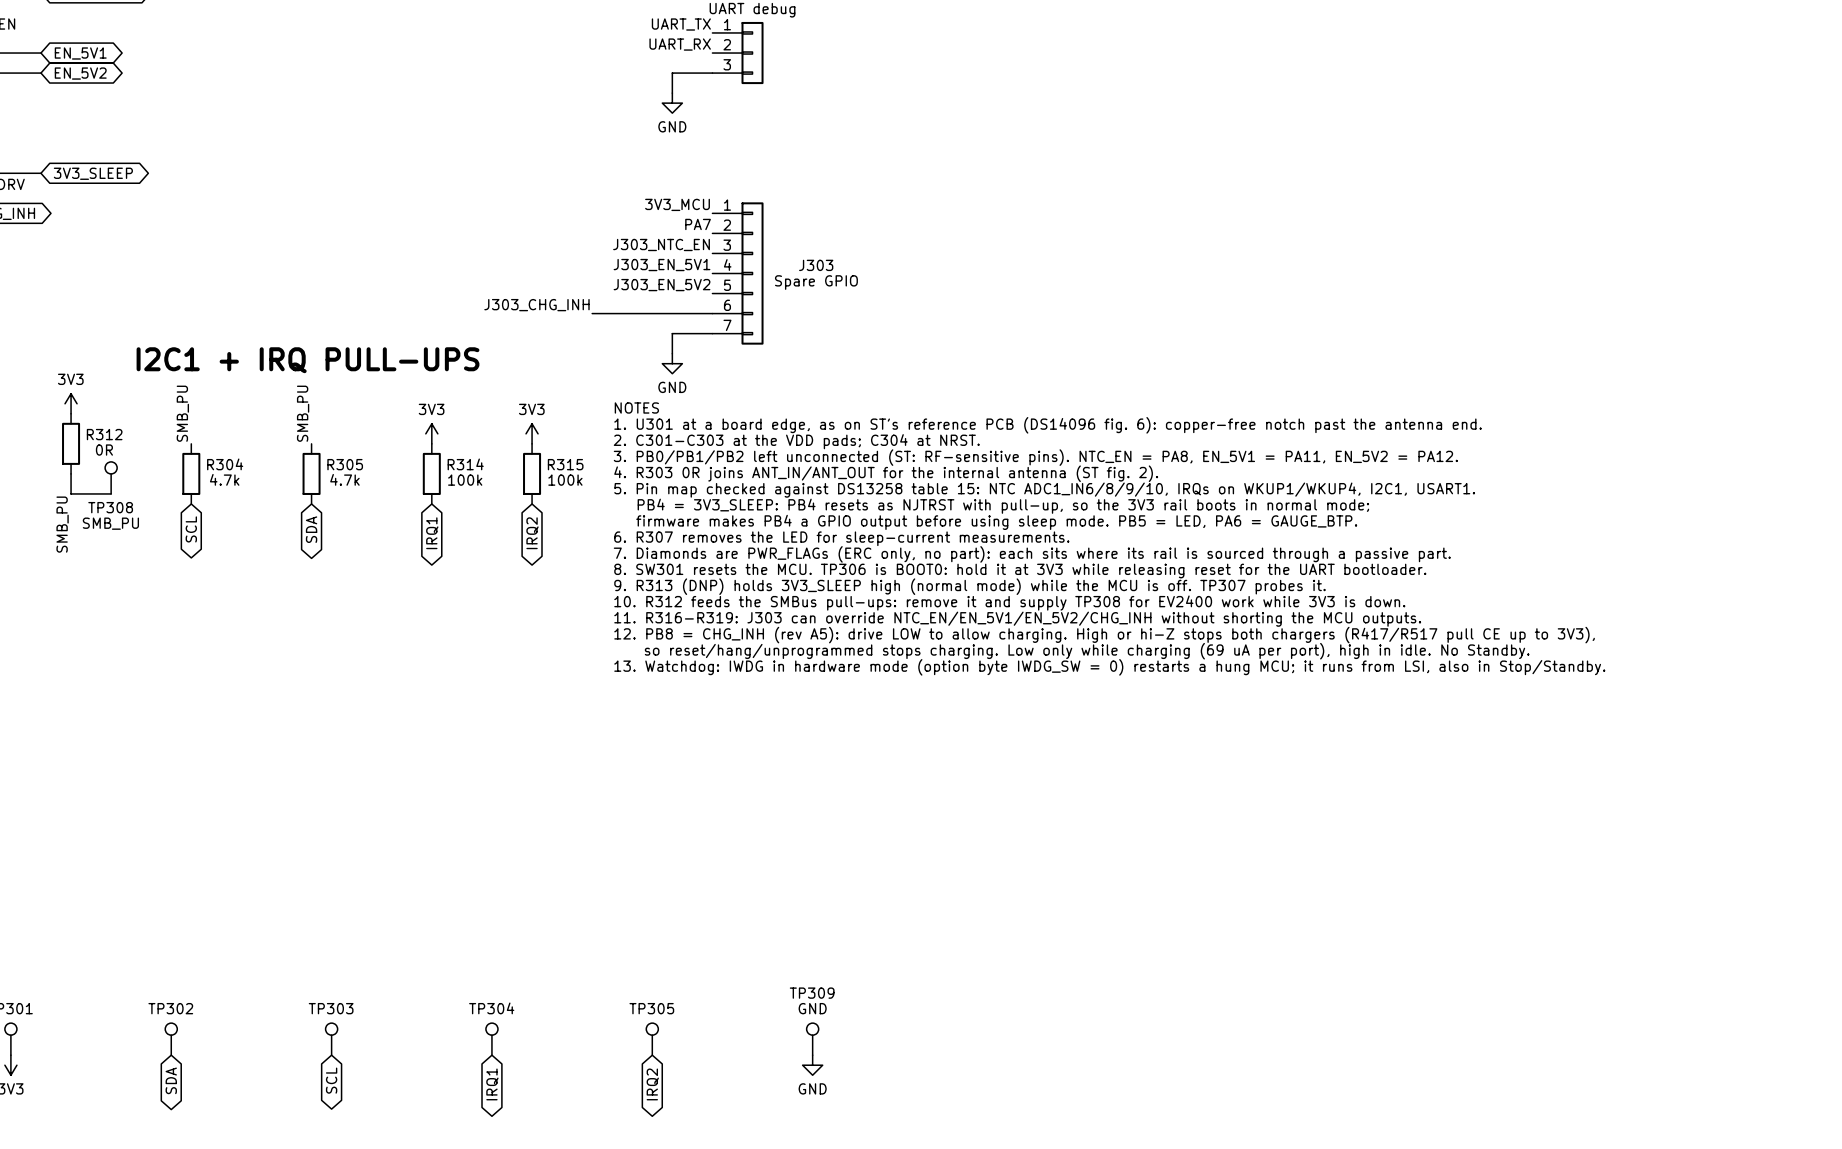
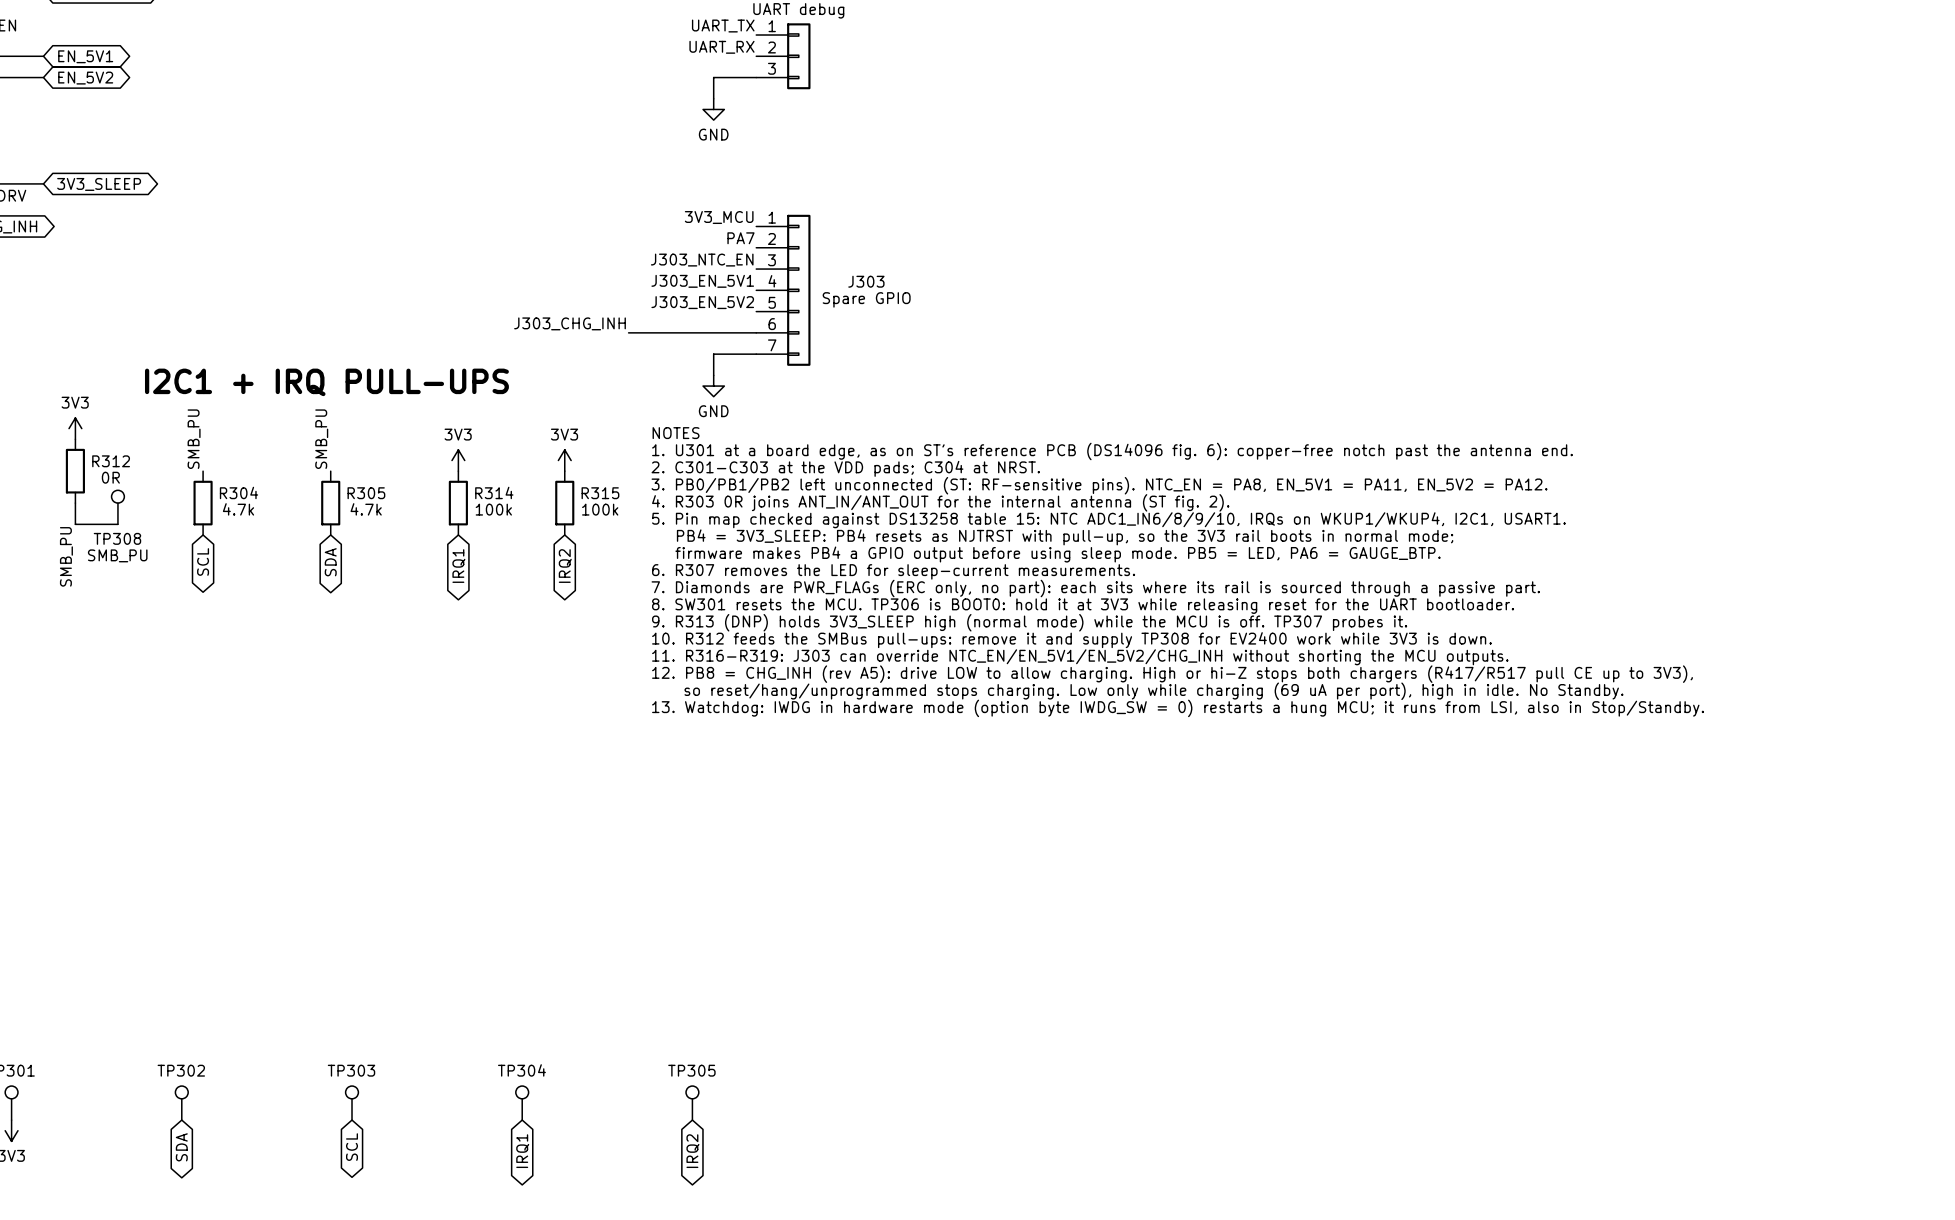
TP309: GND (812, 1039) -> none
power symbol: GND (812, 1065) -> none

